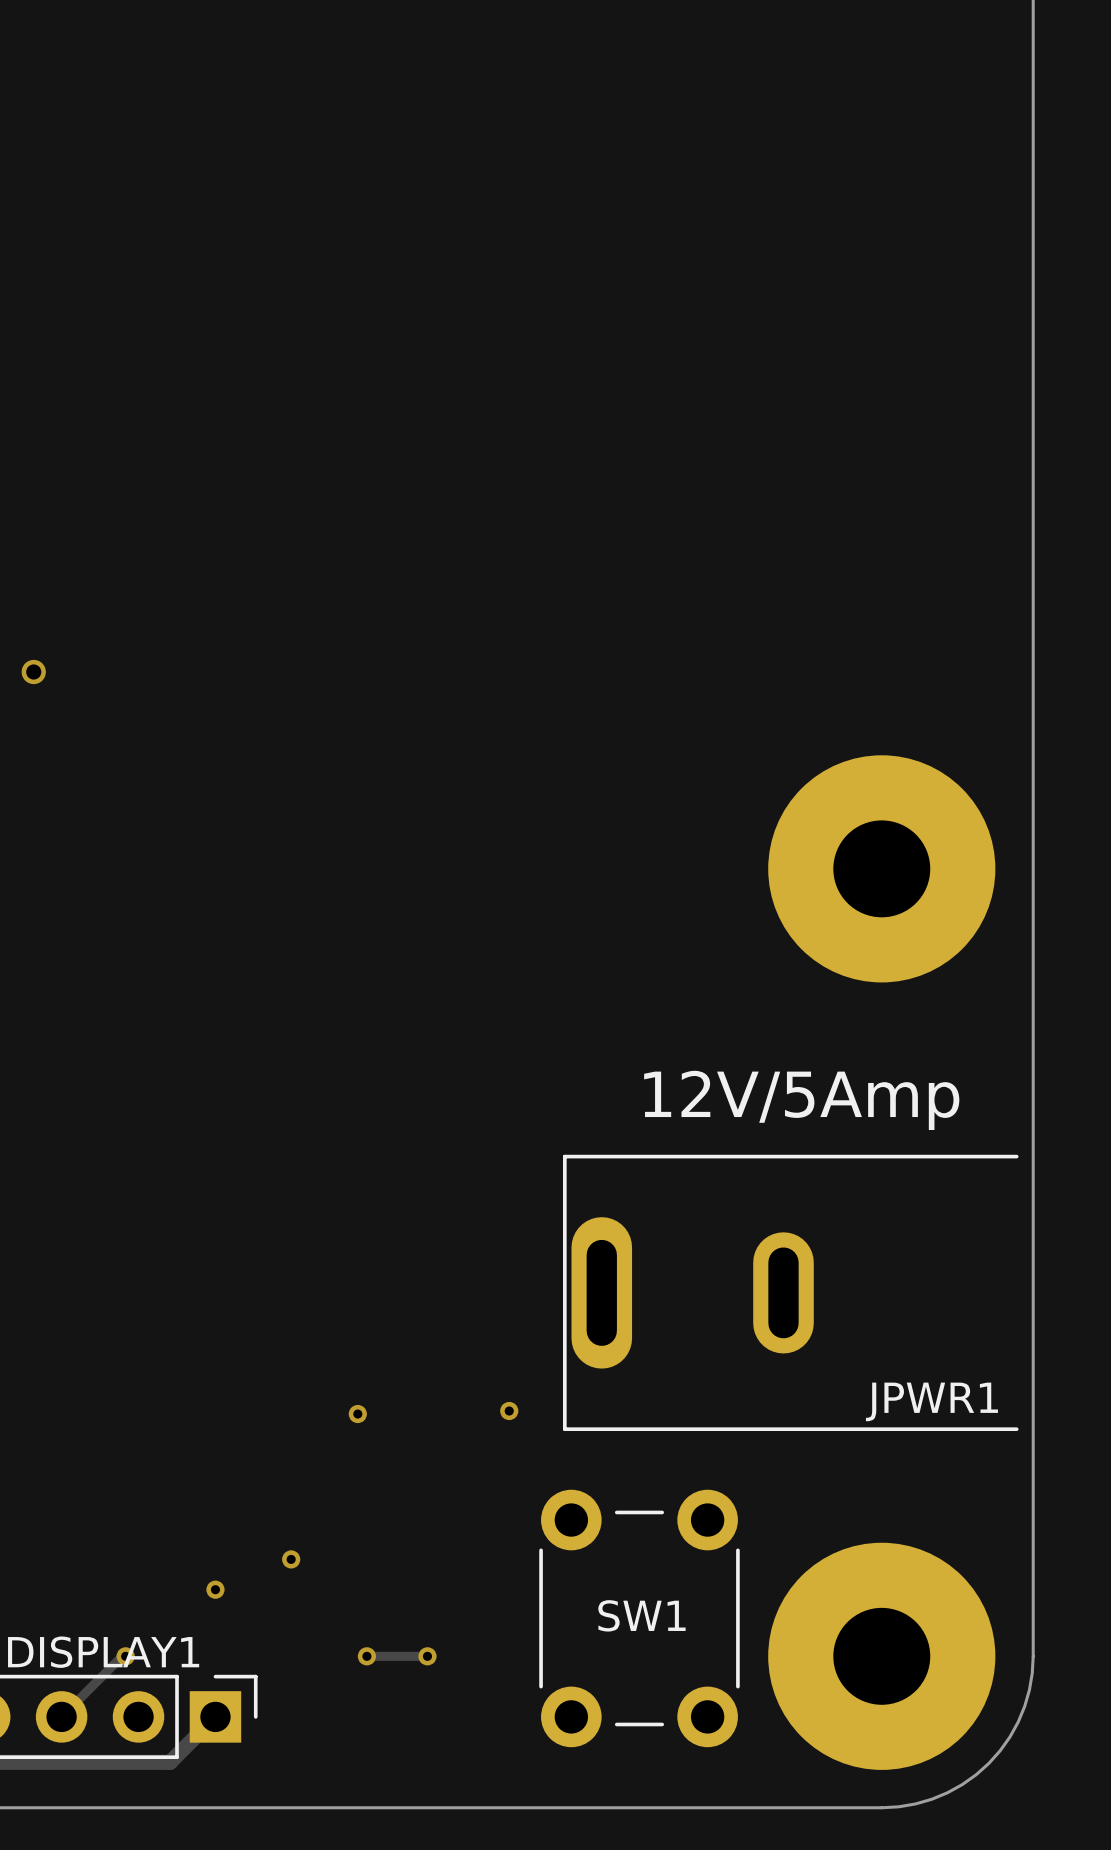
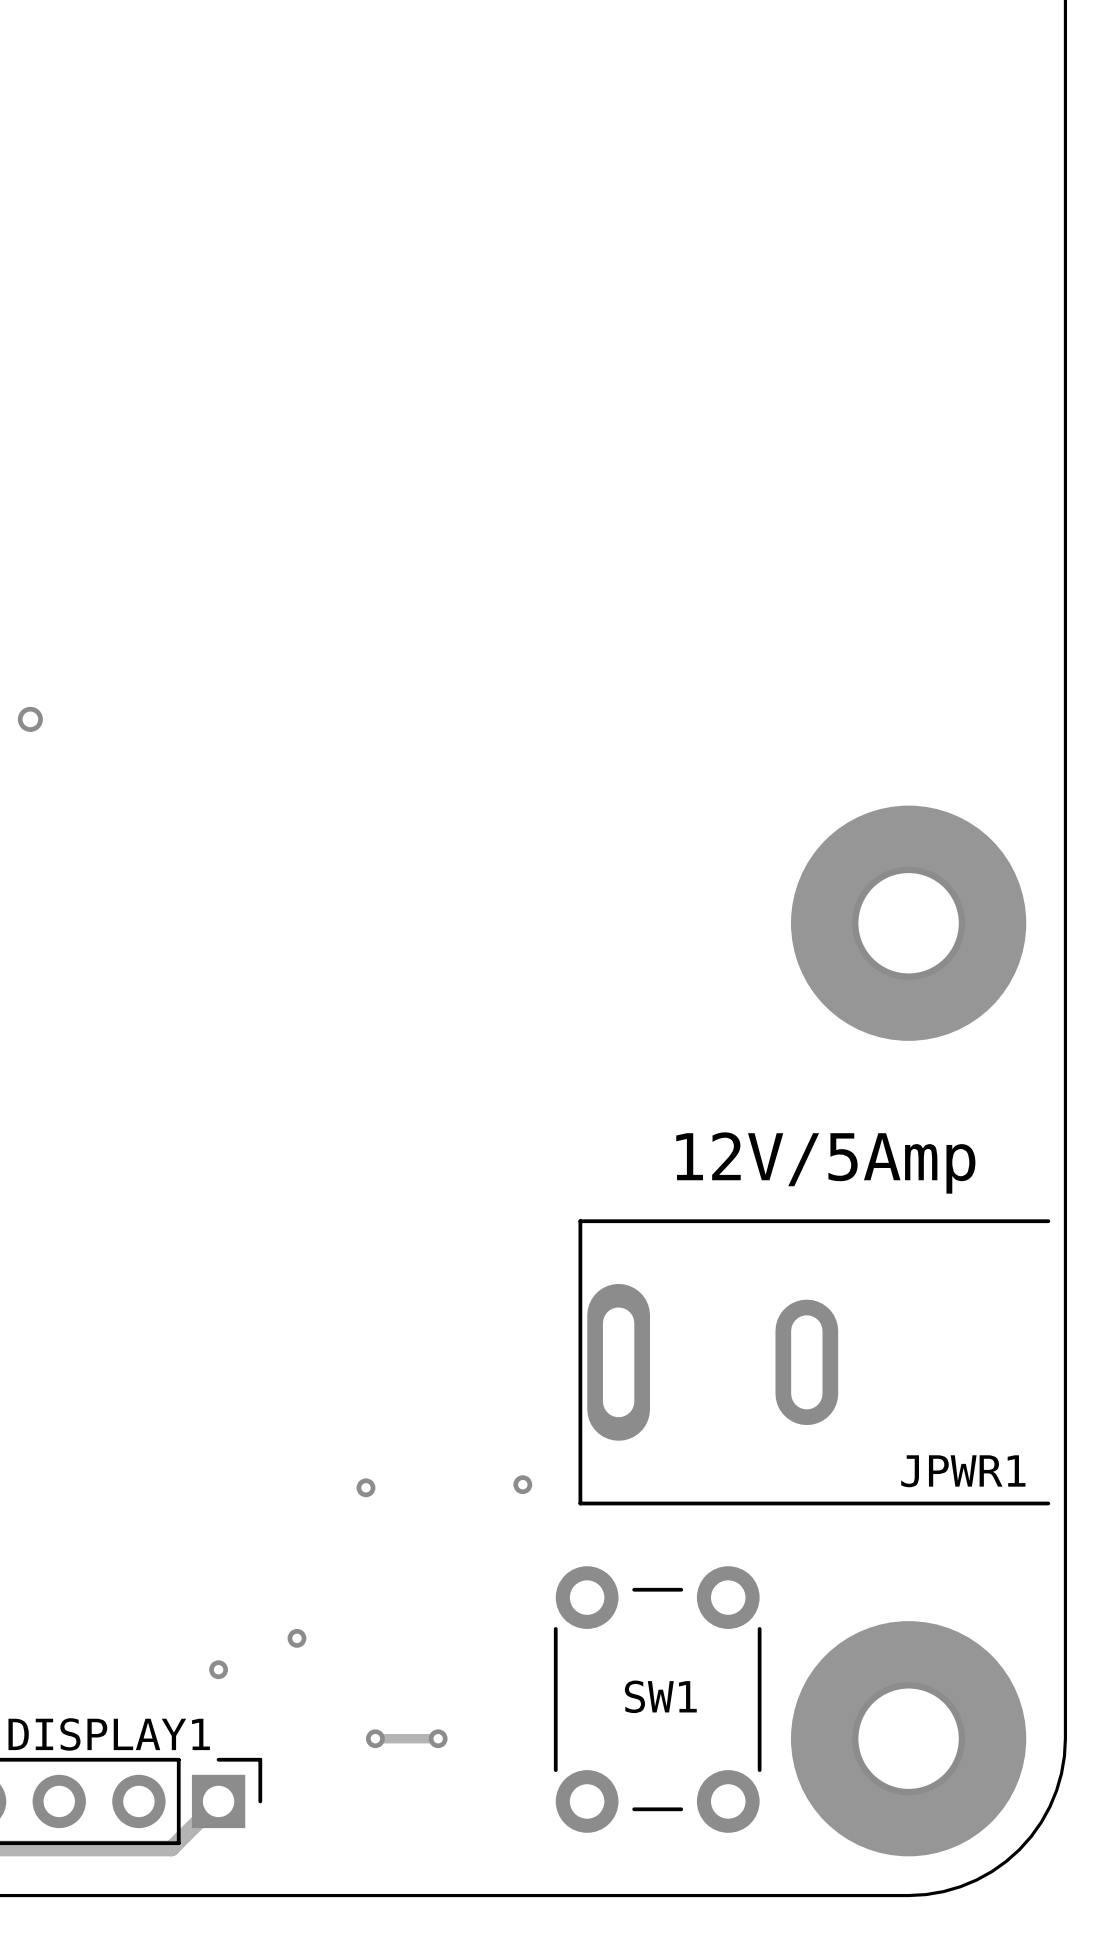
track: (125, 1656) (122, 1656) (61, 1716) -> none
via: (125, 1656) -> none

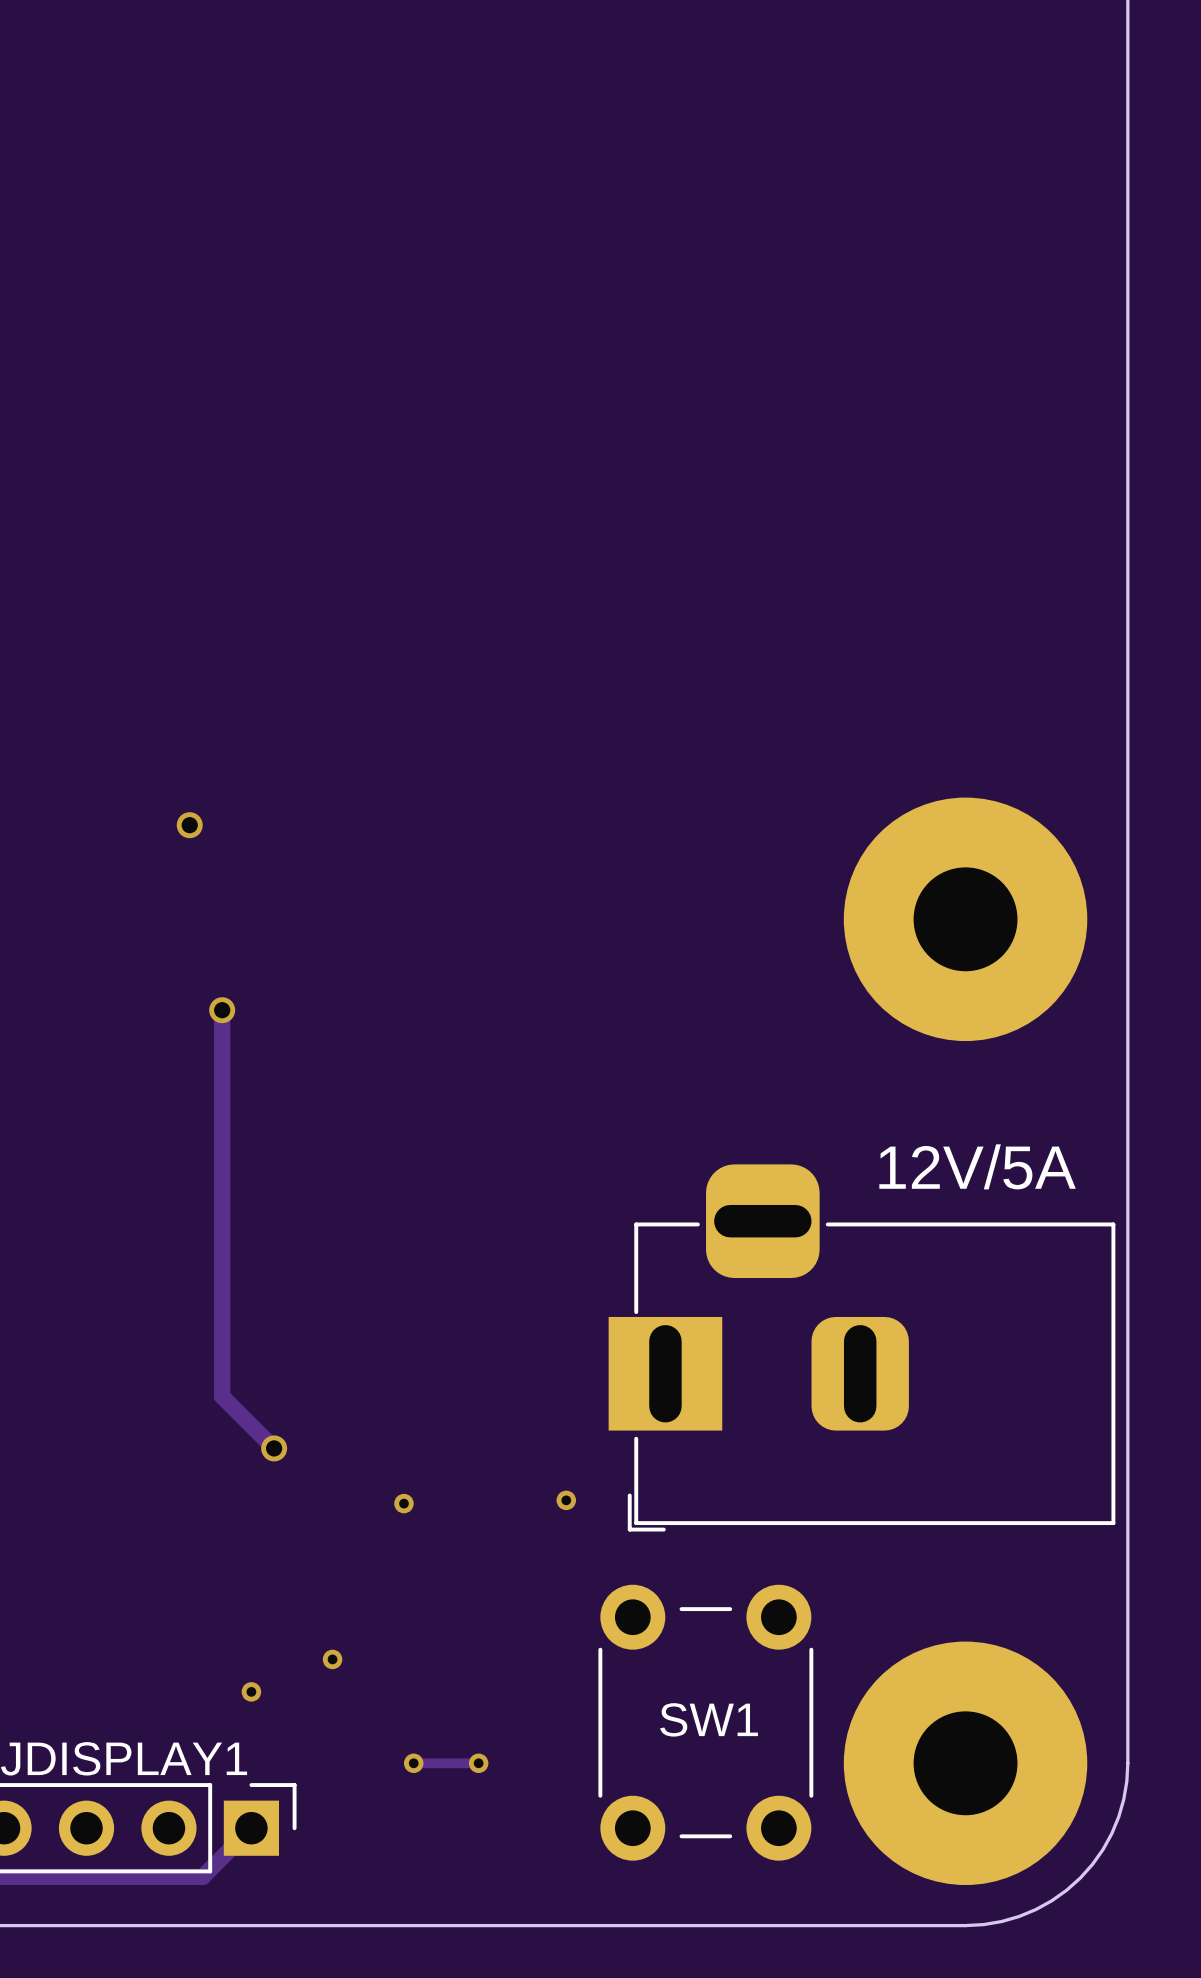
via: (30, 719) -> none
via: none -> (189, 825)
track: none -> (222, 1010) (222, 1396) (274, 1448)
via: none -> (222, 1010)
text: 12V/5Amp (825, 1163) -> 12V/5A (977, 1166)
part: none -> (861, 1347)
JPWR1: (814, 1362) -> none
via: none -> (274, 1448)

